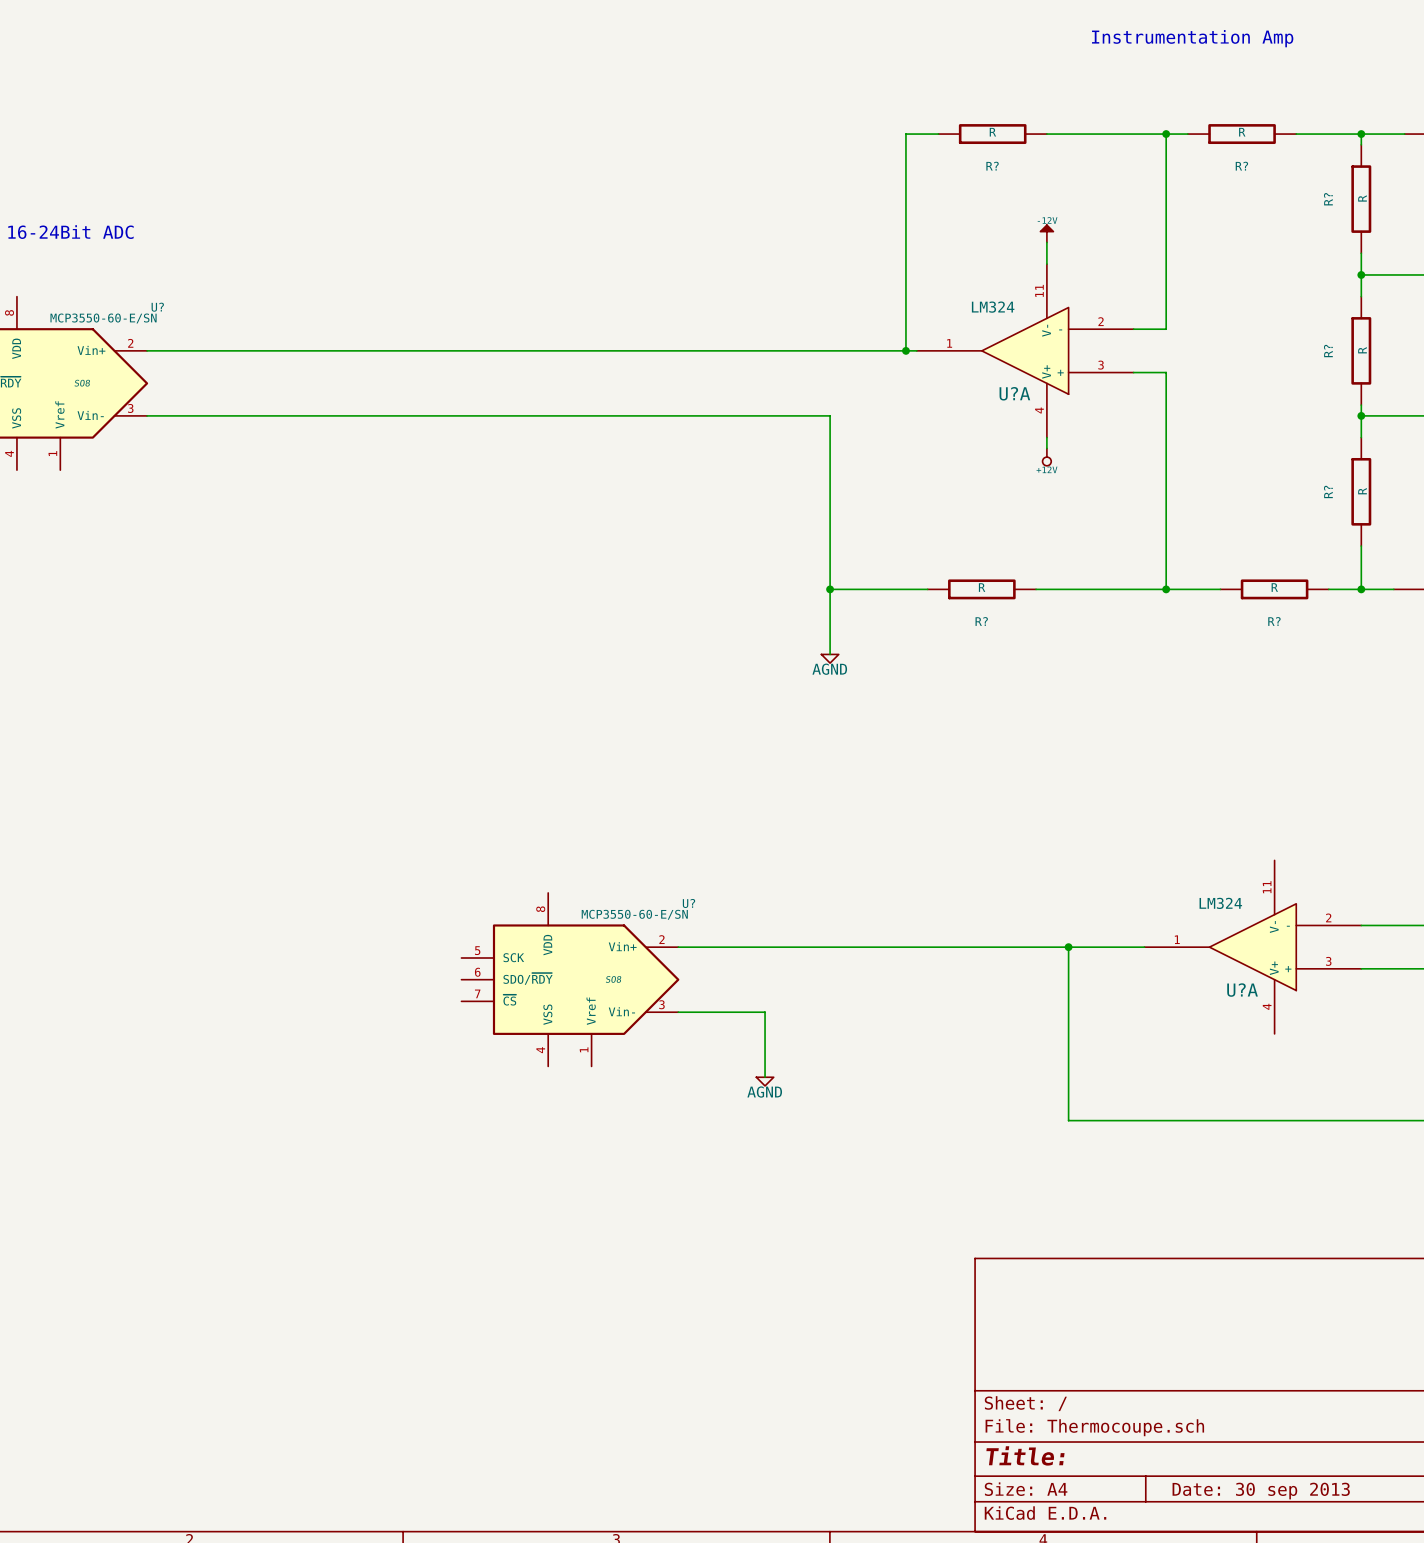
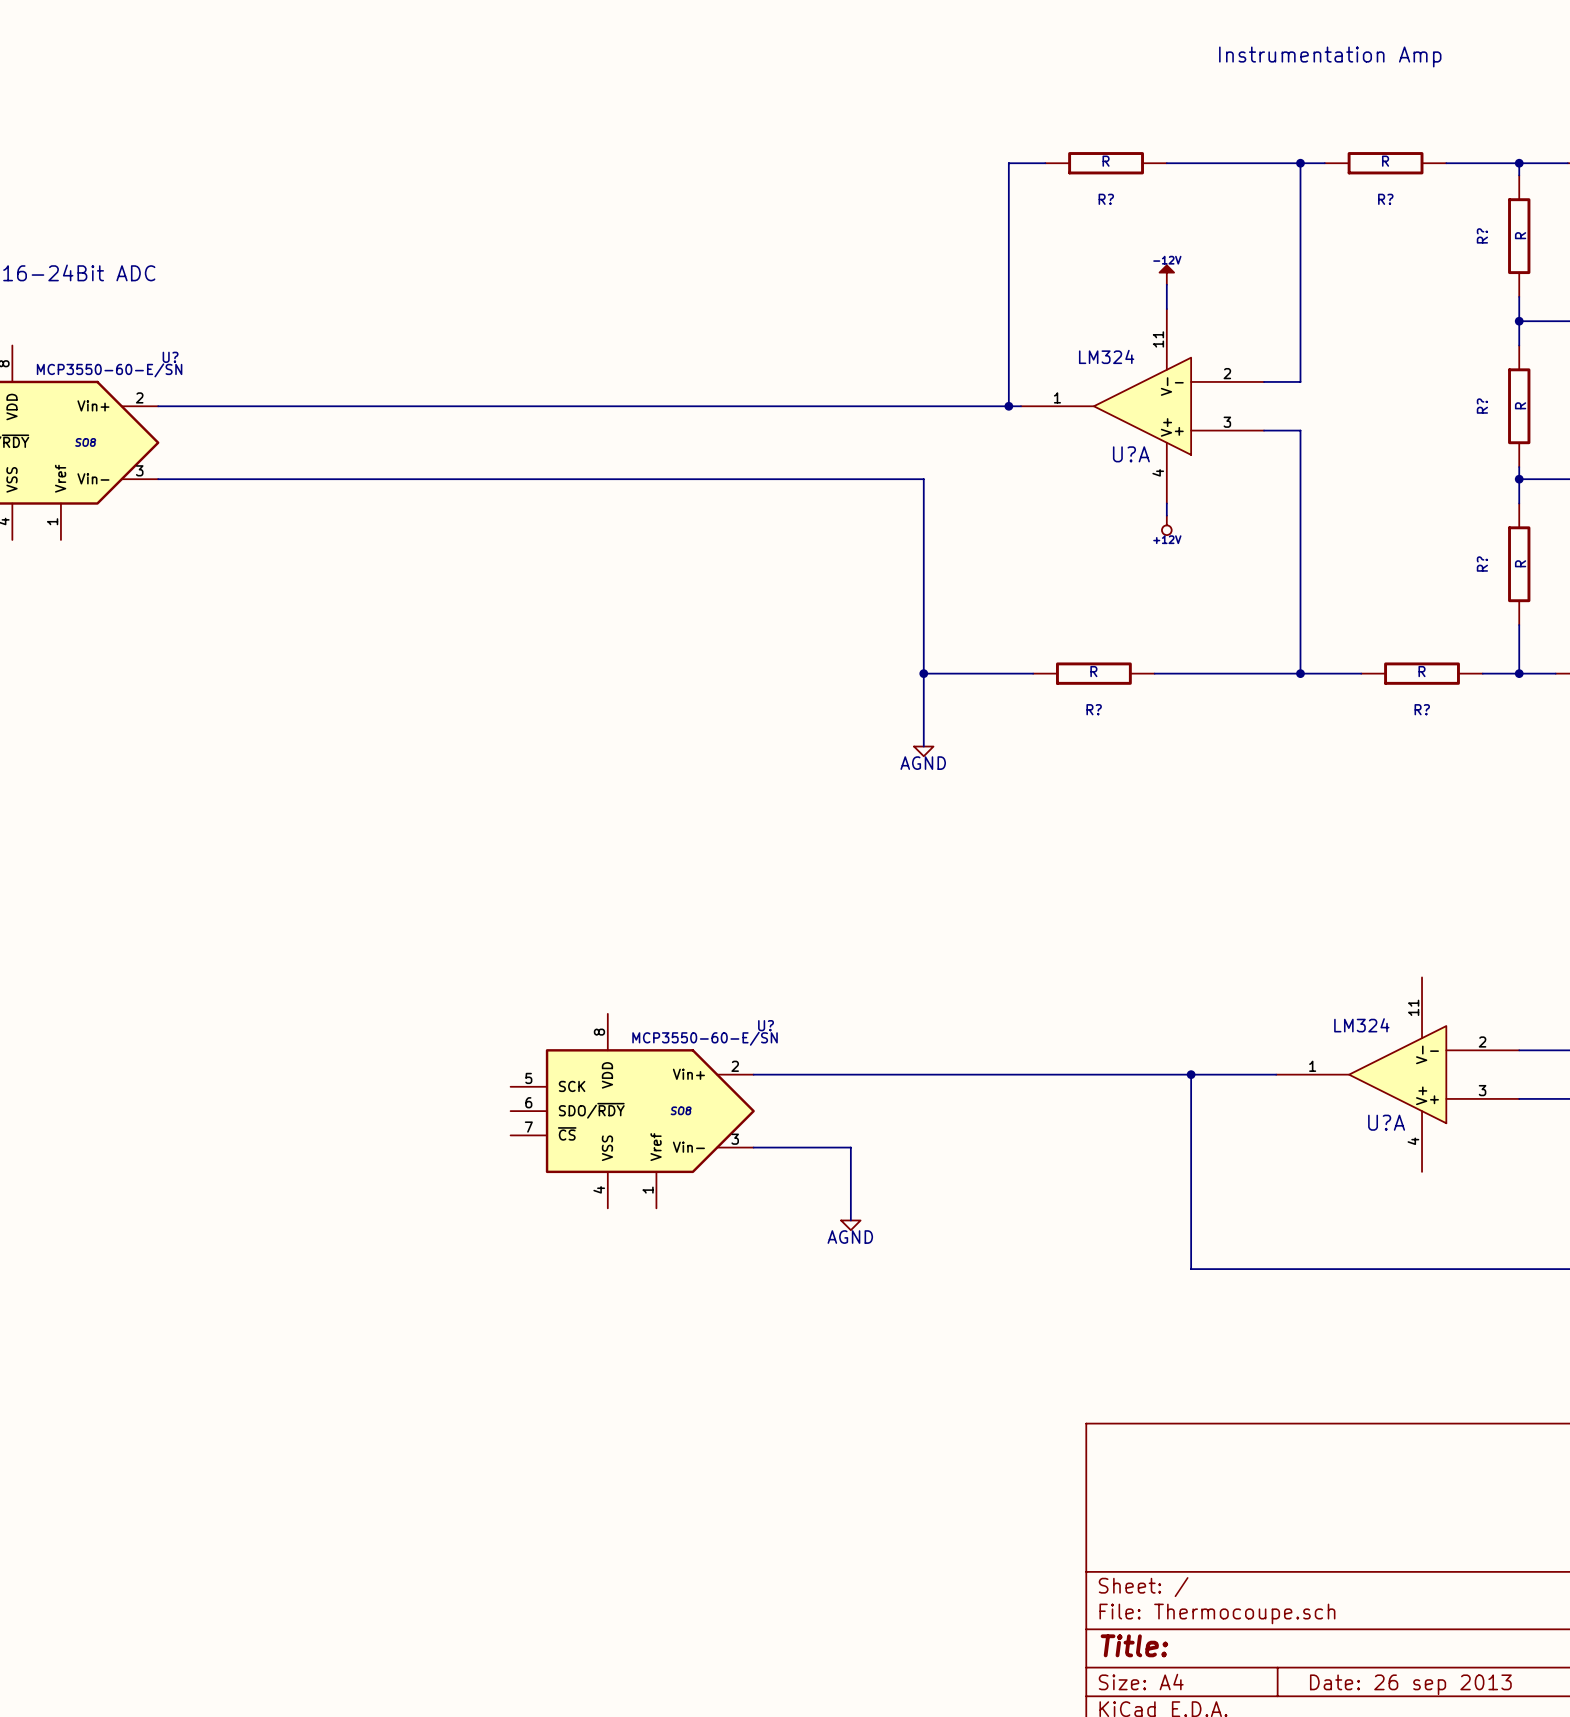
title block: Date: 30 sep 2013 (1261, 1491) -> Date: 26 sep 2013 (1410, 1684)

